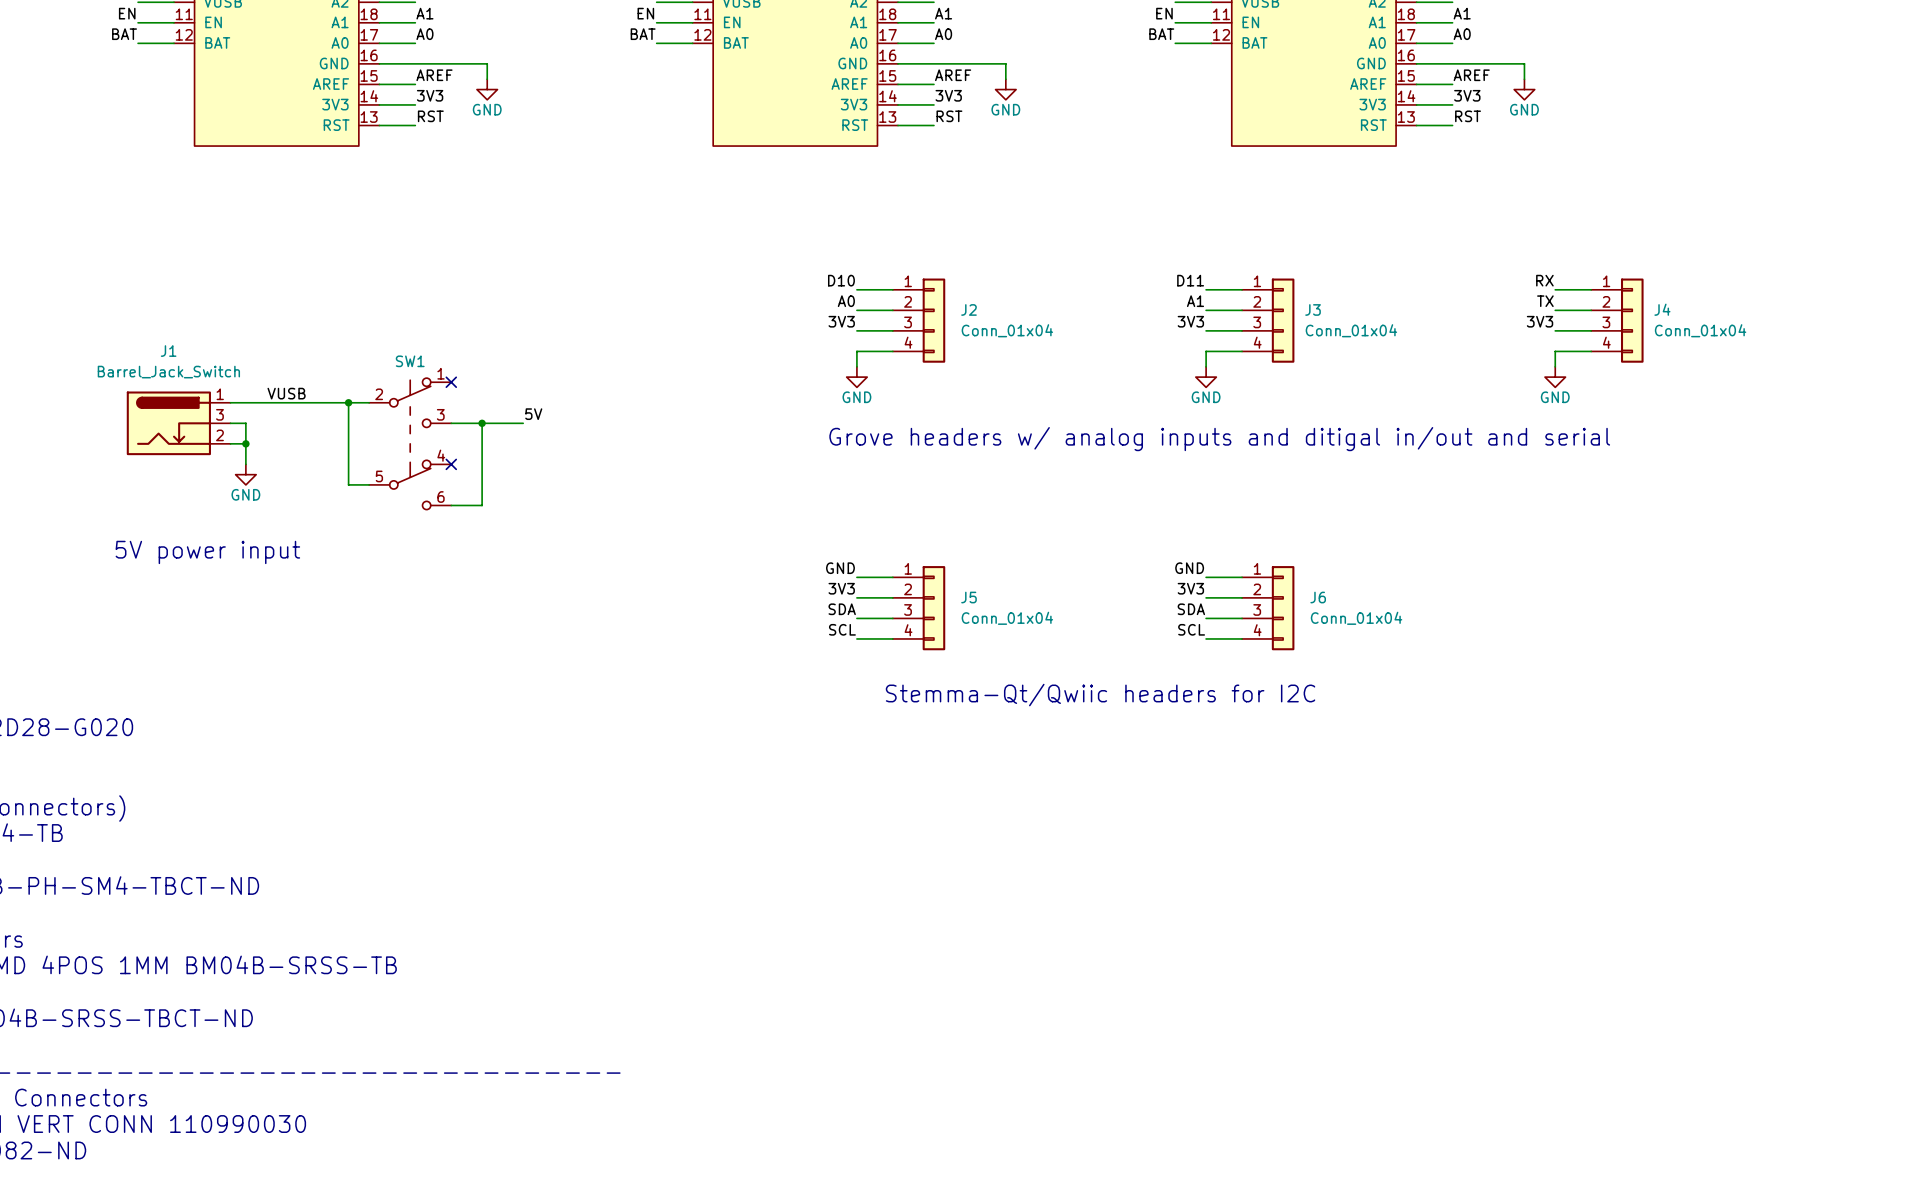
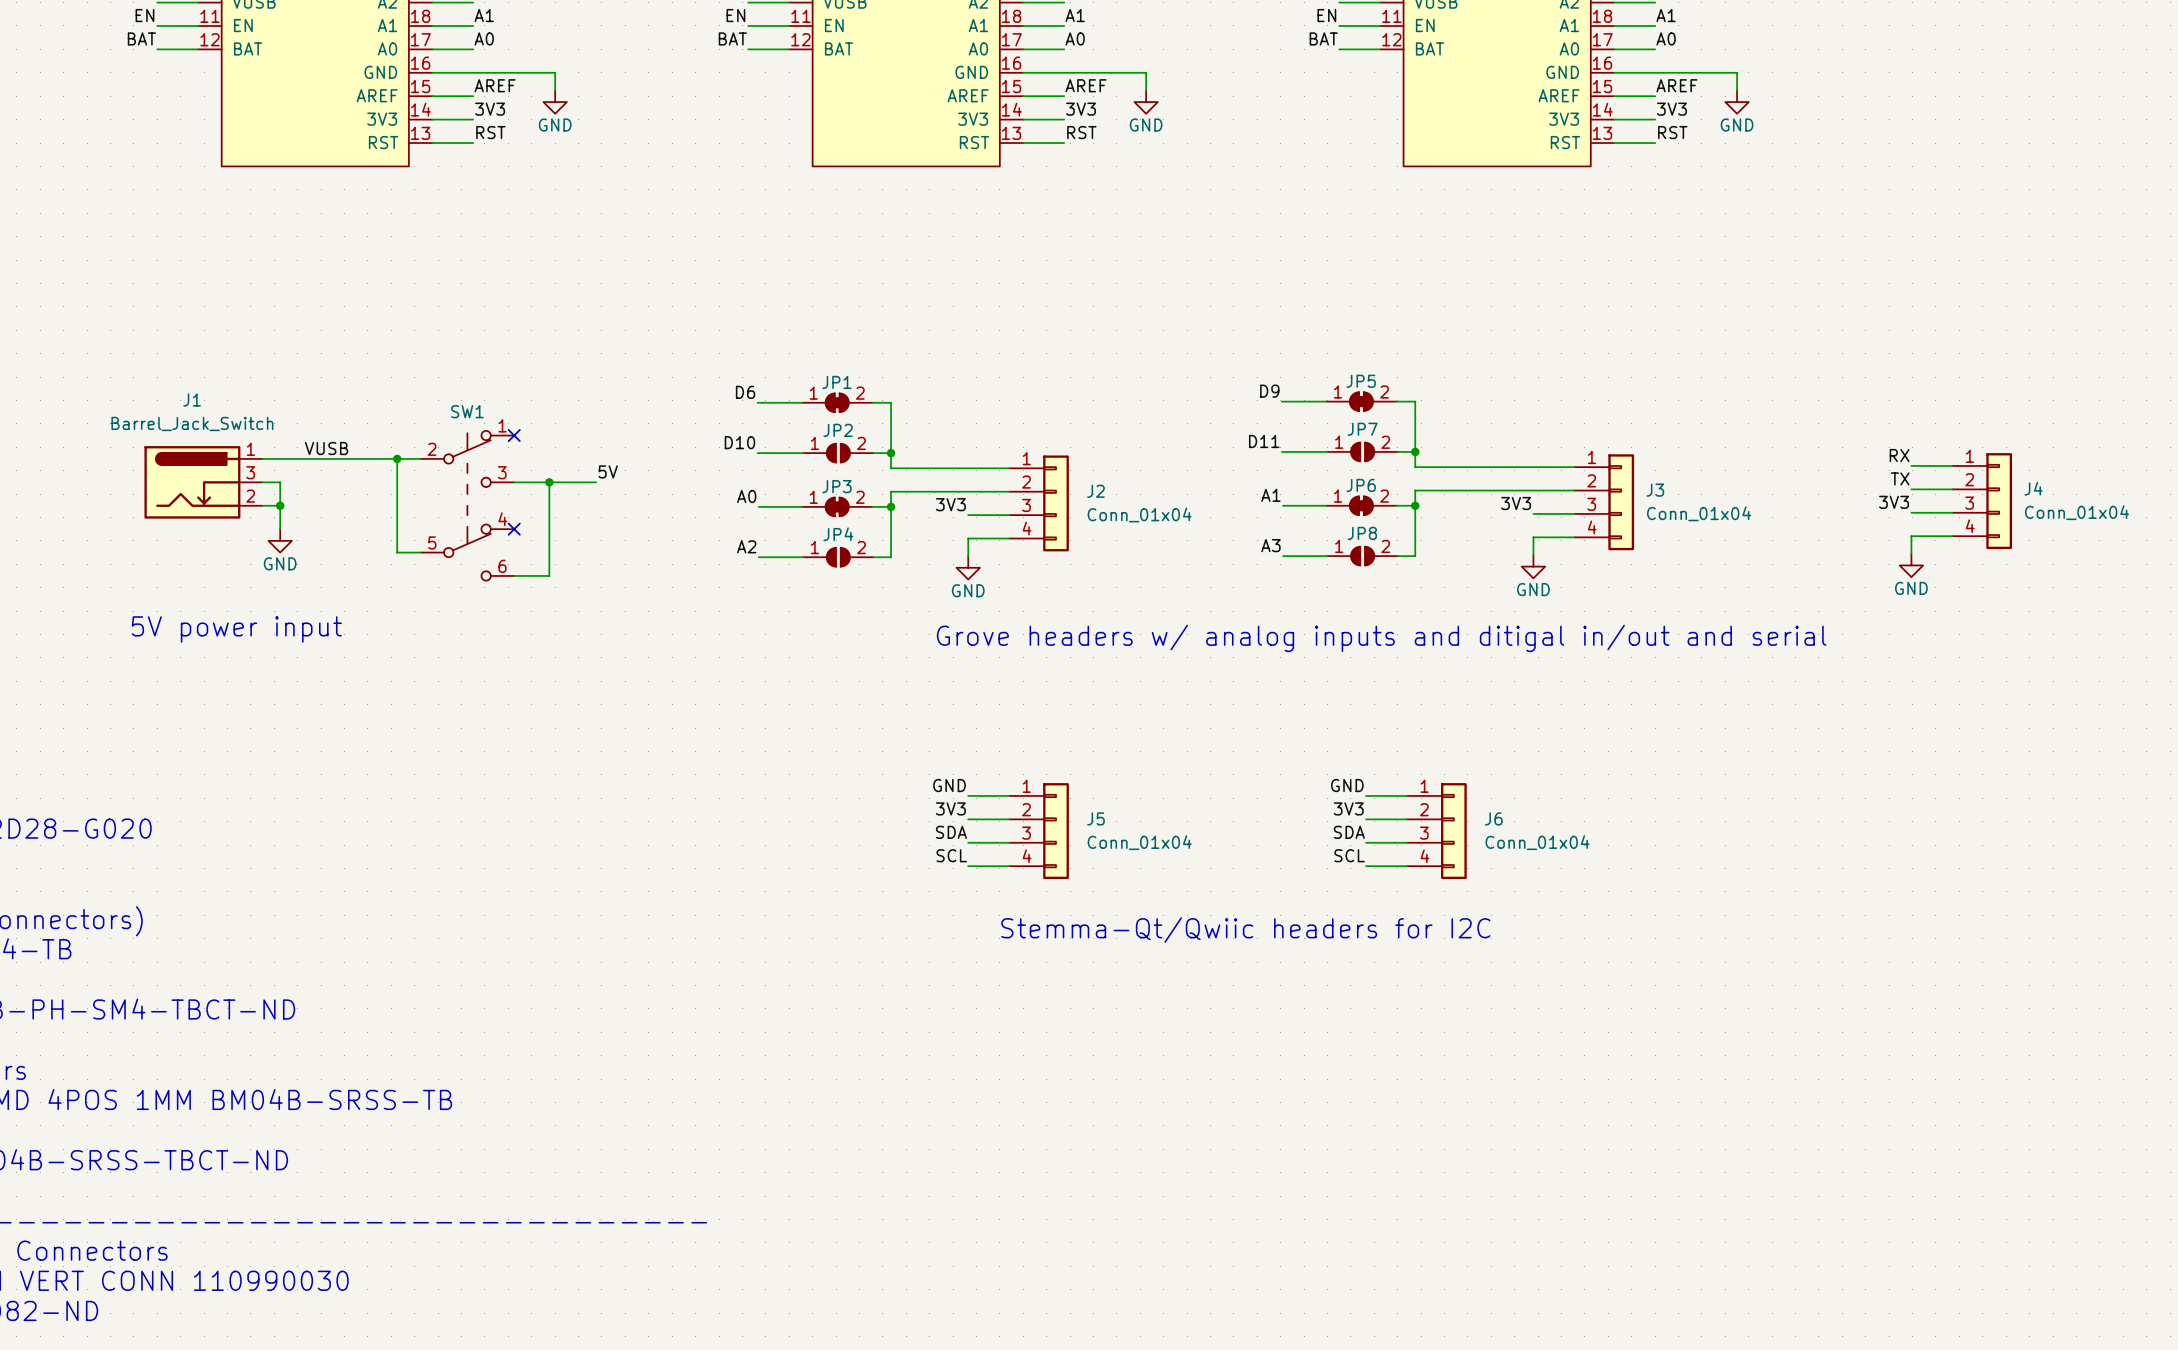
label: D10 (841, 280) -> none
label position: D11 (1190, 280) -> D11 (1264, 441)
label position: RX (1544, 280) -> RX (1899, 455)
wire: (856, 289) (892, 289) -> none
wire: (1206, 289) (1242, 289) -> none
wire: (1555, 289) (1591, 289) -> (1911, 465) (1952, 465)
label: A0 (846, 301) -> none
label position: A1 (1195, 301) -> A1 (1270, 495)
label position: TX (1545, 301) -> TX (1900, 478)
wire: (856, 310) (892, 310) -> none
wire: (1206, 310) (1242, 310) -> none
wire: (1555, 310) (1591, 310) -> (1911, 489) (1952, 489)
J2 position: (919, 320) -> (1039, 503)
J3 position: (1268, 320) -> (1604, 502)
J4 position: (1617, 320) -> (1982, 501)
label: 3V3 (841, 321) -> none
label: 3V3 (1190, 321) -> none
label: 3V3 (1540, 321) -> none
wire: (856, 330) (892, 330) -> (968, 515) (1009, 515)
wire: (1206, 330) (1242, 330) -> (1533, 513) (1574, 513)
wire: (1555, 330) (1591, 330) -> (1911, 512) (1952, 512)
label: none -> D9 (1269, 391)
label: none -> D6 (745, 392)
wire: (892, 351) (856, 351) (856, 366) -> (1009, 538) (968, 538) (968, 556)
wire: (1242, 351) (1206, 351) (1206, 366) -> (1574, 537) (1533, 537) (1533, 554)
wire: (1591, 351) (1555, 351) (1555, 366) -> (1952, 536) (1911, 536) (1911, 553)
wire: none -> (1281, 401) (1326, 401)
JP5: none -> (1361, 401)
wire: none -> (1396, 401) (1415, 401) (1415, 467) (1574, 467)
wire: none -> (757, 402) (802, 402)
JP1: none -> (837, 402)
wire: none -> (872, 402) (891, 402) (891, 468) (1009, 468)
power symbol position: GND (856, 377) -> GND (968, 567)
power symbol: GND (1206, 377) -> none
power symbol: GND (1555, 377) -> none
label: none -> D10 (739, 442)
wire: none -> (1281, 451) (1327, 451)
JP7: none -> (1362, 451)
wire: none -> (1397, 451) (1415, 451)
junction: none -> (1415, 451)
wire: none -> (757, 453) (803, 453)
JP2: none -> (838, 453)
wire: none -> (873, 453) (891, 453)
junction: none -> (891, 453)
wire: none -> (1574, 490) (1415, 490) (1415, 556) (1397, 556)
wire: none -> (1009, 491) (891, 491) (891, 557) (873, 557)
label: none -> A0 (746, 496)
text position: Grove headers w/ analog inputs and ditigal in/out and serial (1219, 439) -> Grove headers w/ analog inputs and ditigal in/out and serial (1381, 638)
label: none -> 3V3 (1894, 502)
label: none -> 3V3 (1516, 503)
label: none -> 3V3 (950, 504)
wire: none -> (1283, 505) (1326, 505)
JP6: none -> (1361, 505)
wire: none -> (1396, 505) (1415, 505)
junction: none -> (1415, 505)
wire: none -> (758, 506) (802, 506)
JP3: none -> (837, 506)
wire: none -> (872, 506) (891, 506)
junction: none -> (891, 506)
label: none -> A3 (1270, 545)
label: none -> A2 (746, 546)
wire: none -> (1283, 556) (1327, 556)
JP8: none -> (1362, 556)
wire: none -> (758, 557) (803, 557)
JP4: none -> (838, 557)
power symbol: none -> GND (1911, 565)
power symbol: none -> GND (1533, 566)
label position: GND (840, 568) -> GND (949, 785)
label position: GND (1189, 568) -> GND (1347, 785)
wire: (856, 577) (892, 577) -> (968, 795) (1009, 795)
wire: (1206, 577) (1242, 577) -> (1366, 795) (1407, 795)
label: 3V3 (841, 588) -> none
label: 3V3 (1190, 588) -> none
wire: (856, 597) (892, 597) -> (968, 819) (1009, 819)
wire: (1206, 597) (1242, 597) -> (1366, 819) (1407, 819)
J5 position: (919, 608) -> (1039, 831)
J6 position: (1268, 608) -> (1436, 831)
label position: SDA (842, 609) -> SDA (951, 832)
label position: SDA (1191, 609) -> SDA (1349, 832)
wire: (856, 618) (892, 618) -> (968, 842) (1009, 842)
wire: (1206, 618) (1242, 618) -> (1366, 842) (1407, 842)
label position: SCL (842, 629) -> SCL (951, 855)
label position: SCL (1191, 629) -> SCL (1349, 855)
wire: (856, 638) (892, 638) -> (968, 866) (1009, 866)
wire: (1206, 638) (1242, 638) -> (1366, 866) (1407, 866)
text position: Stemma-Qt/Qwiic headers for I2C (1100, 695) -> Stemma-Qt/Qwiic headers for I2C (1245, 930)
label: none -> 3V3 (950, 808)
label: none -> 3V3 (1348, 808)

